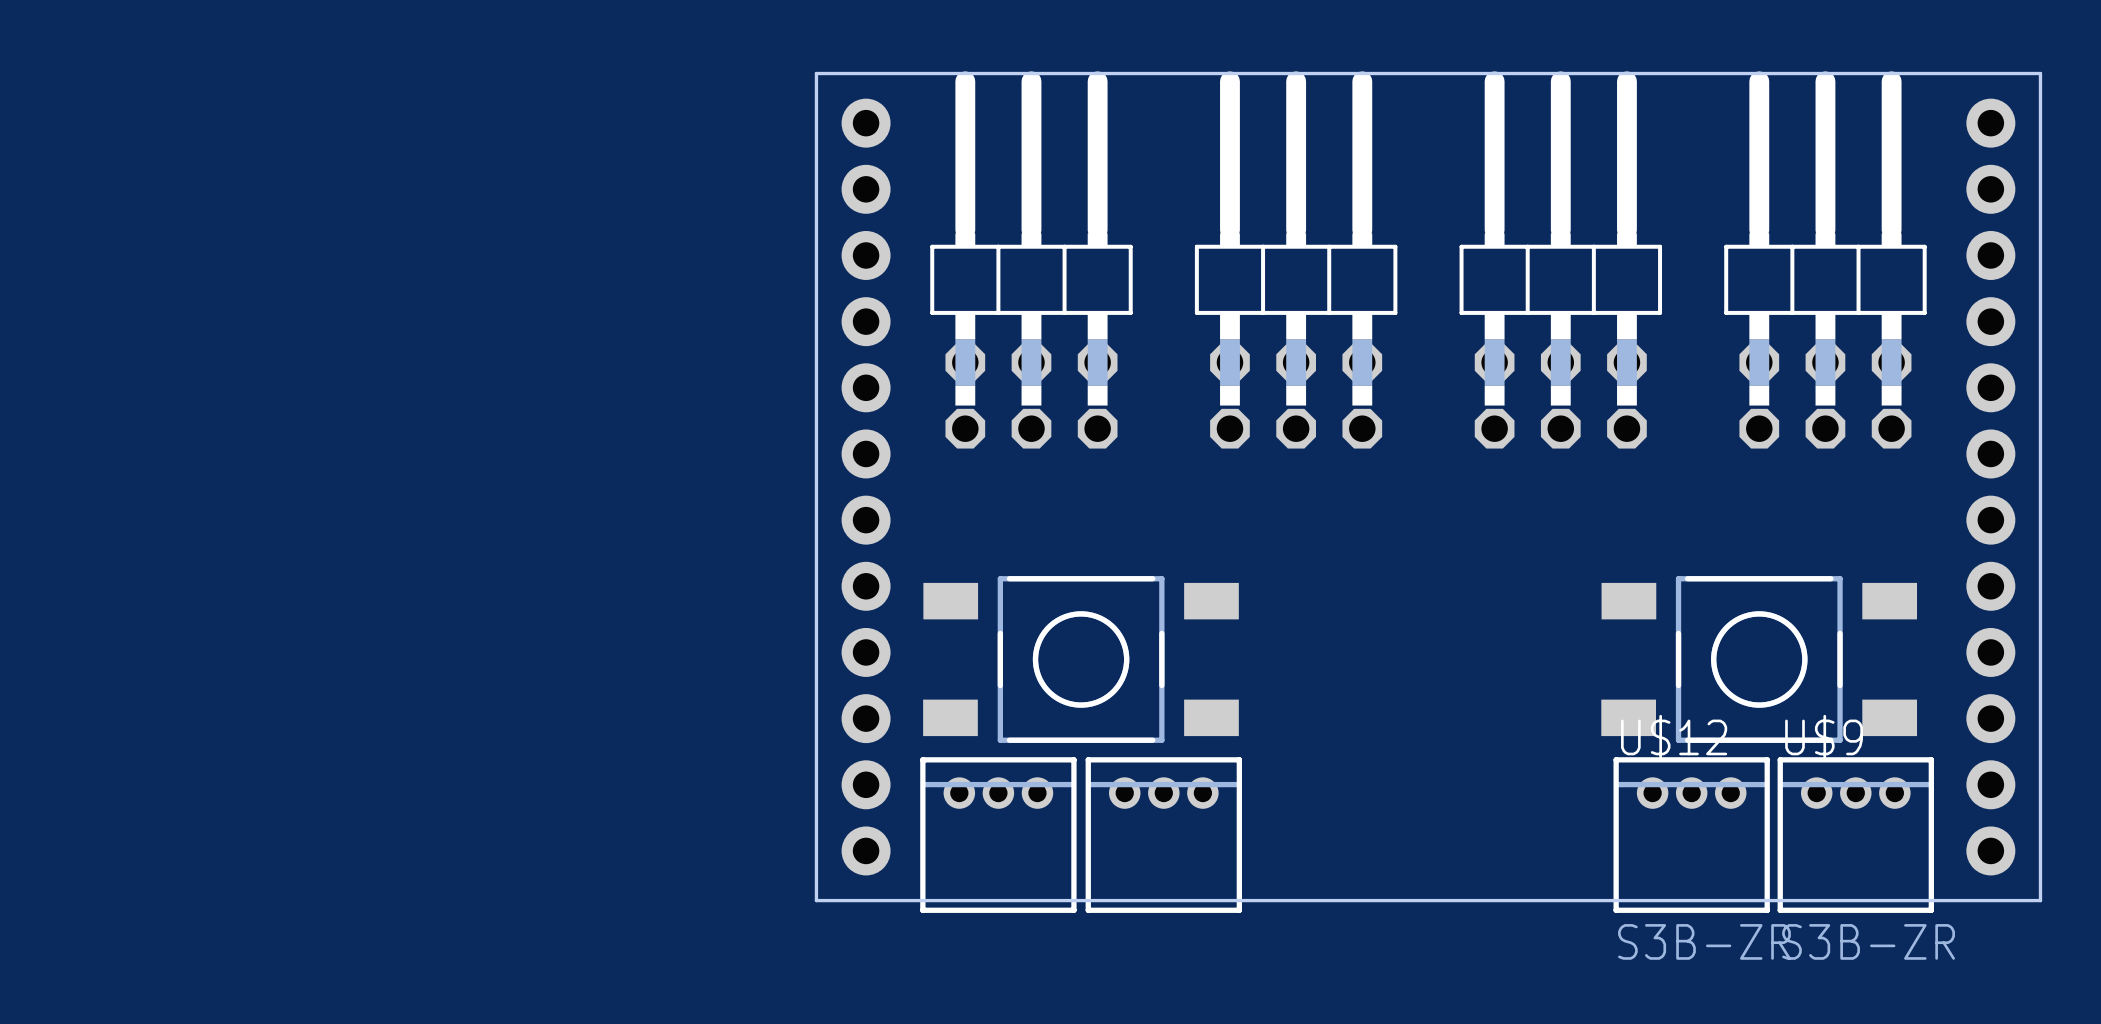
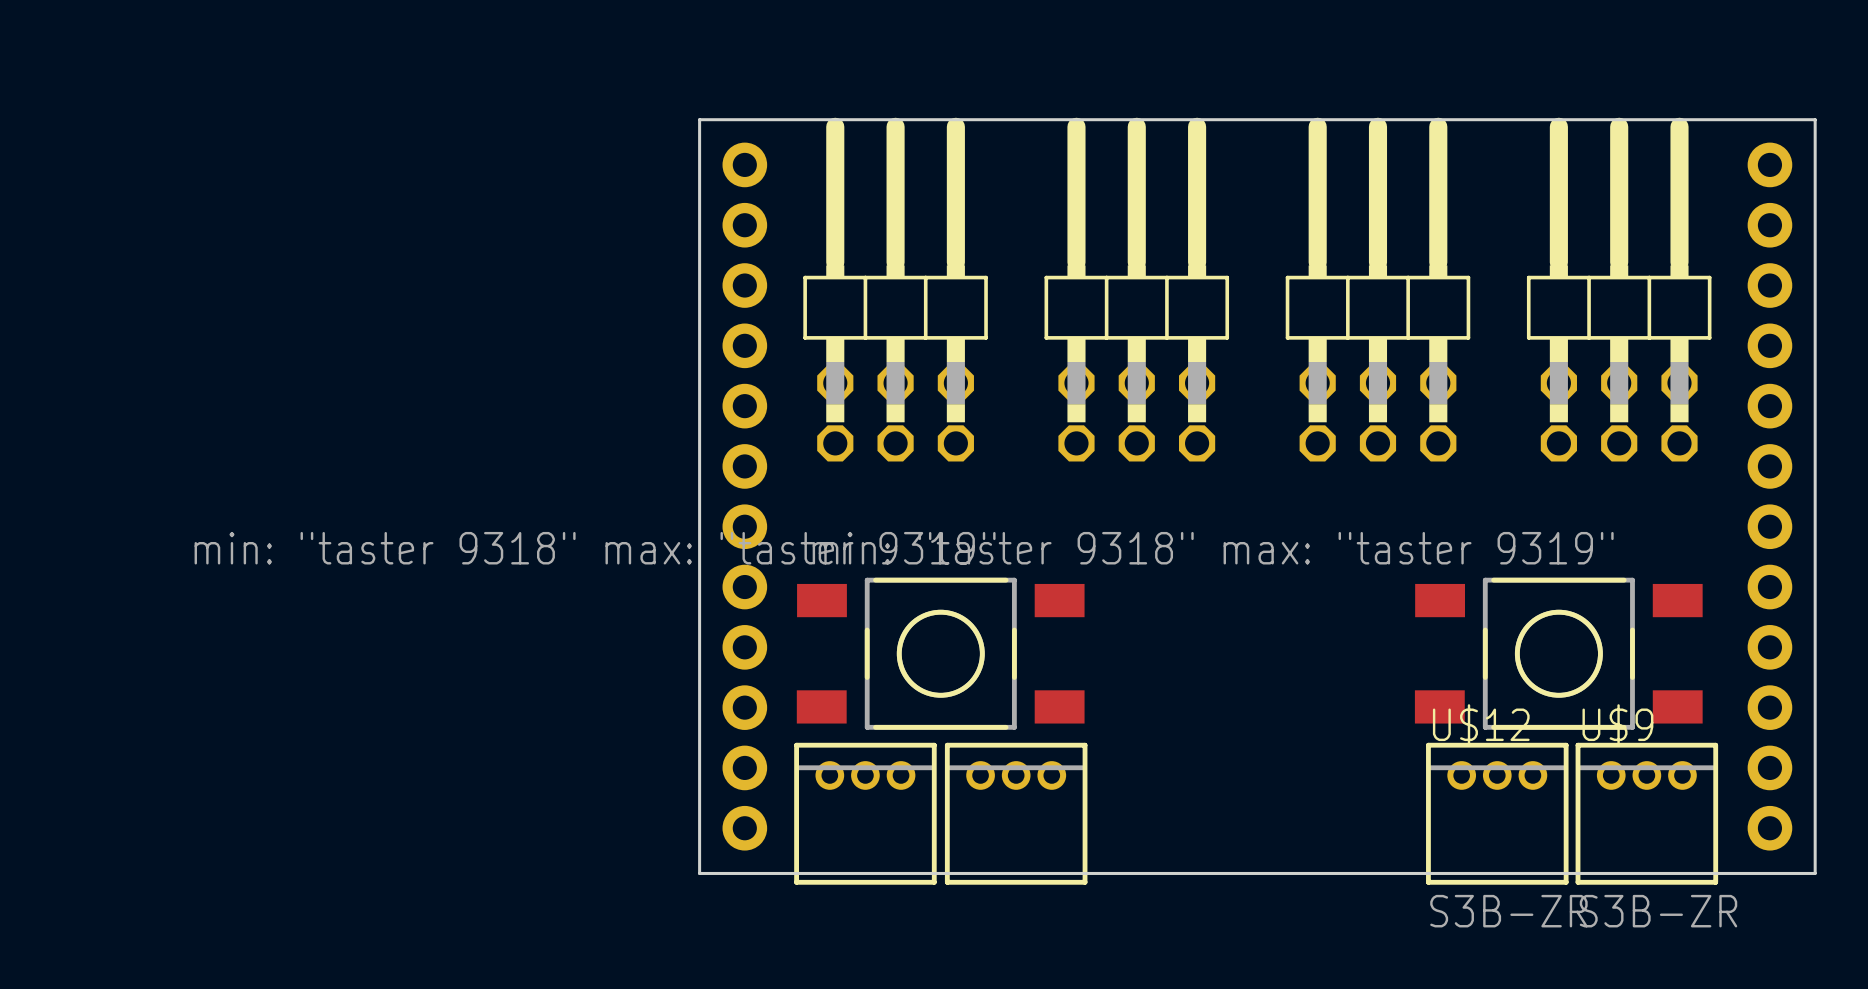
part value: none -> min: "taster 9318" max: "taster 9319" (595, 548)
part value: none -> min: "taster 9318" max: "taster 9319" (1213, 548)

